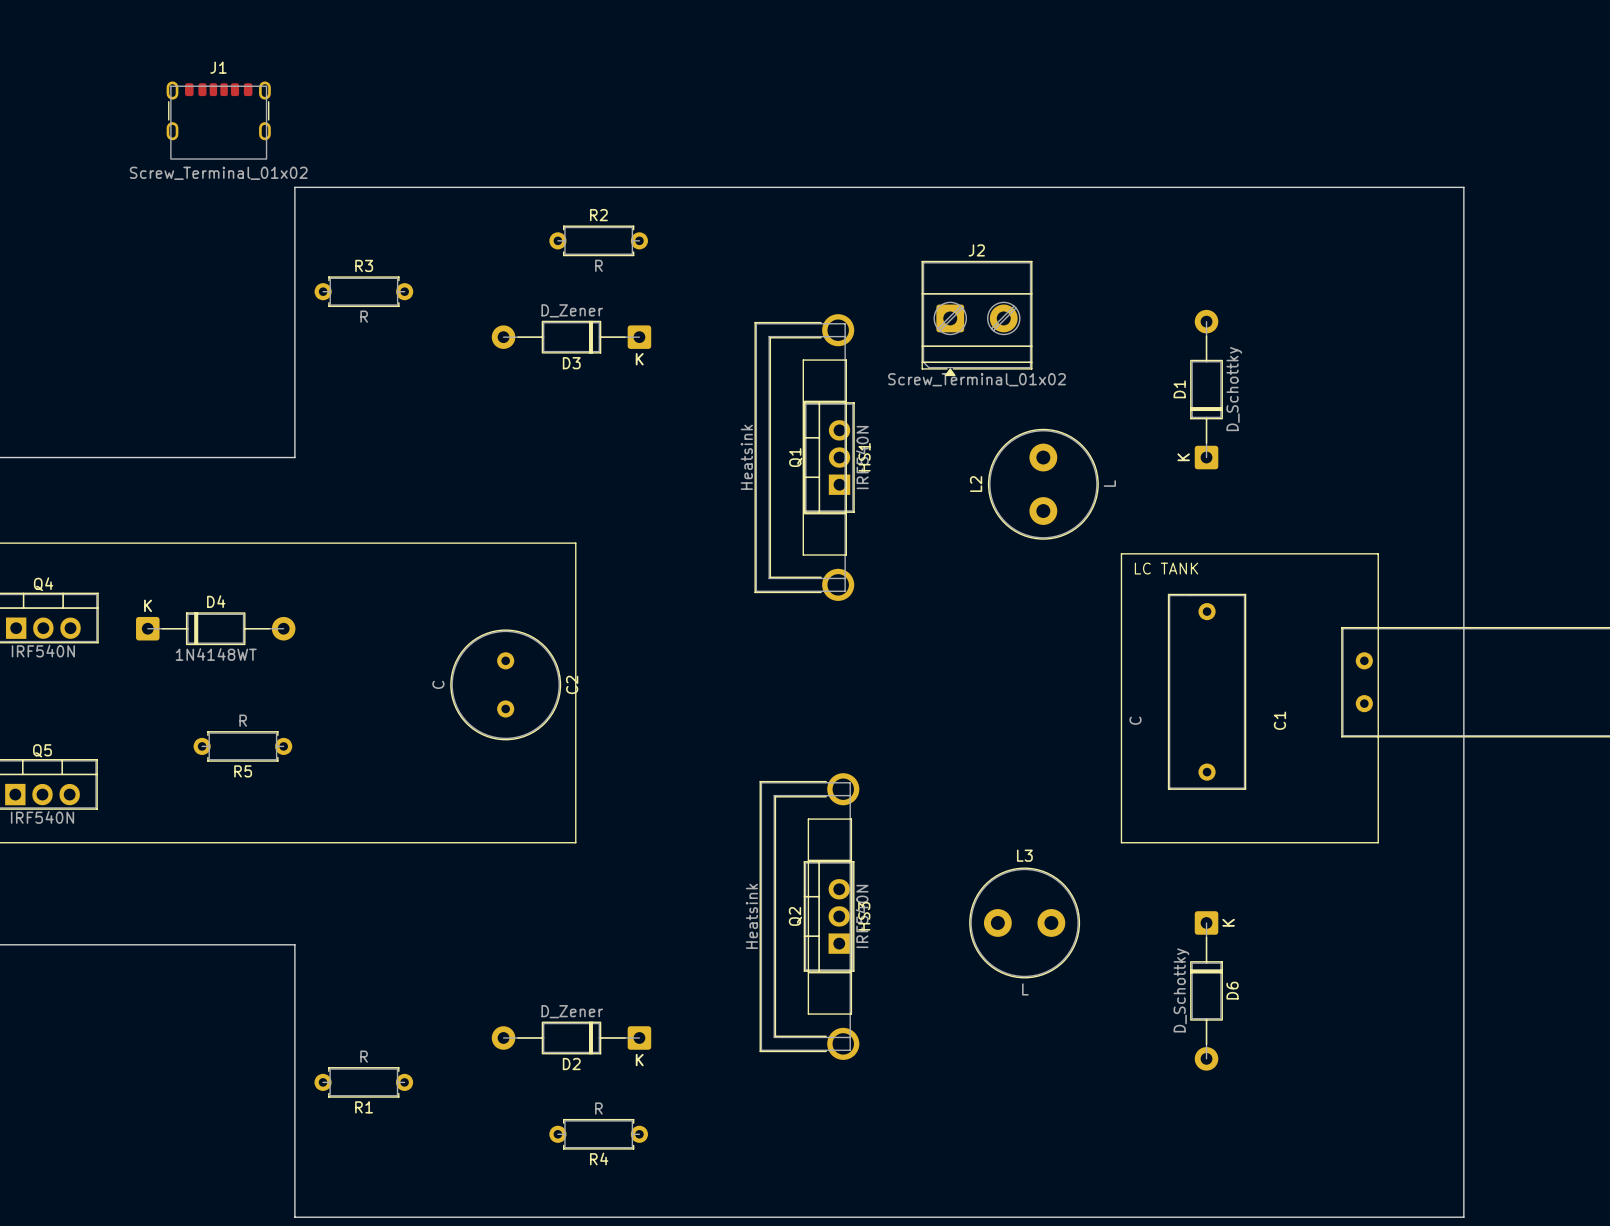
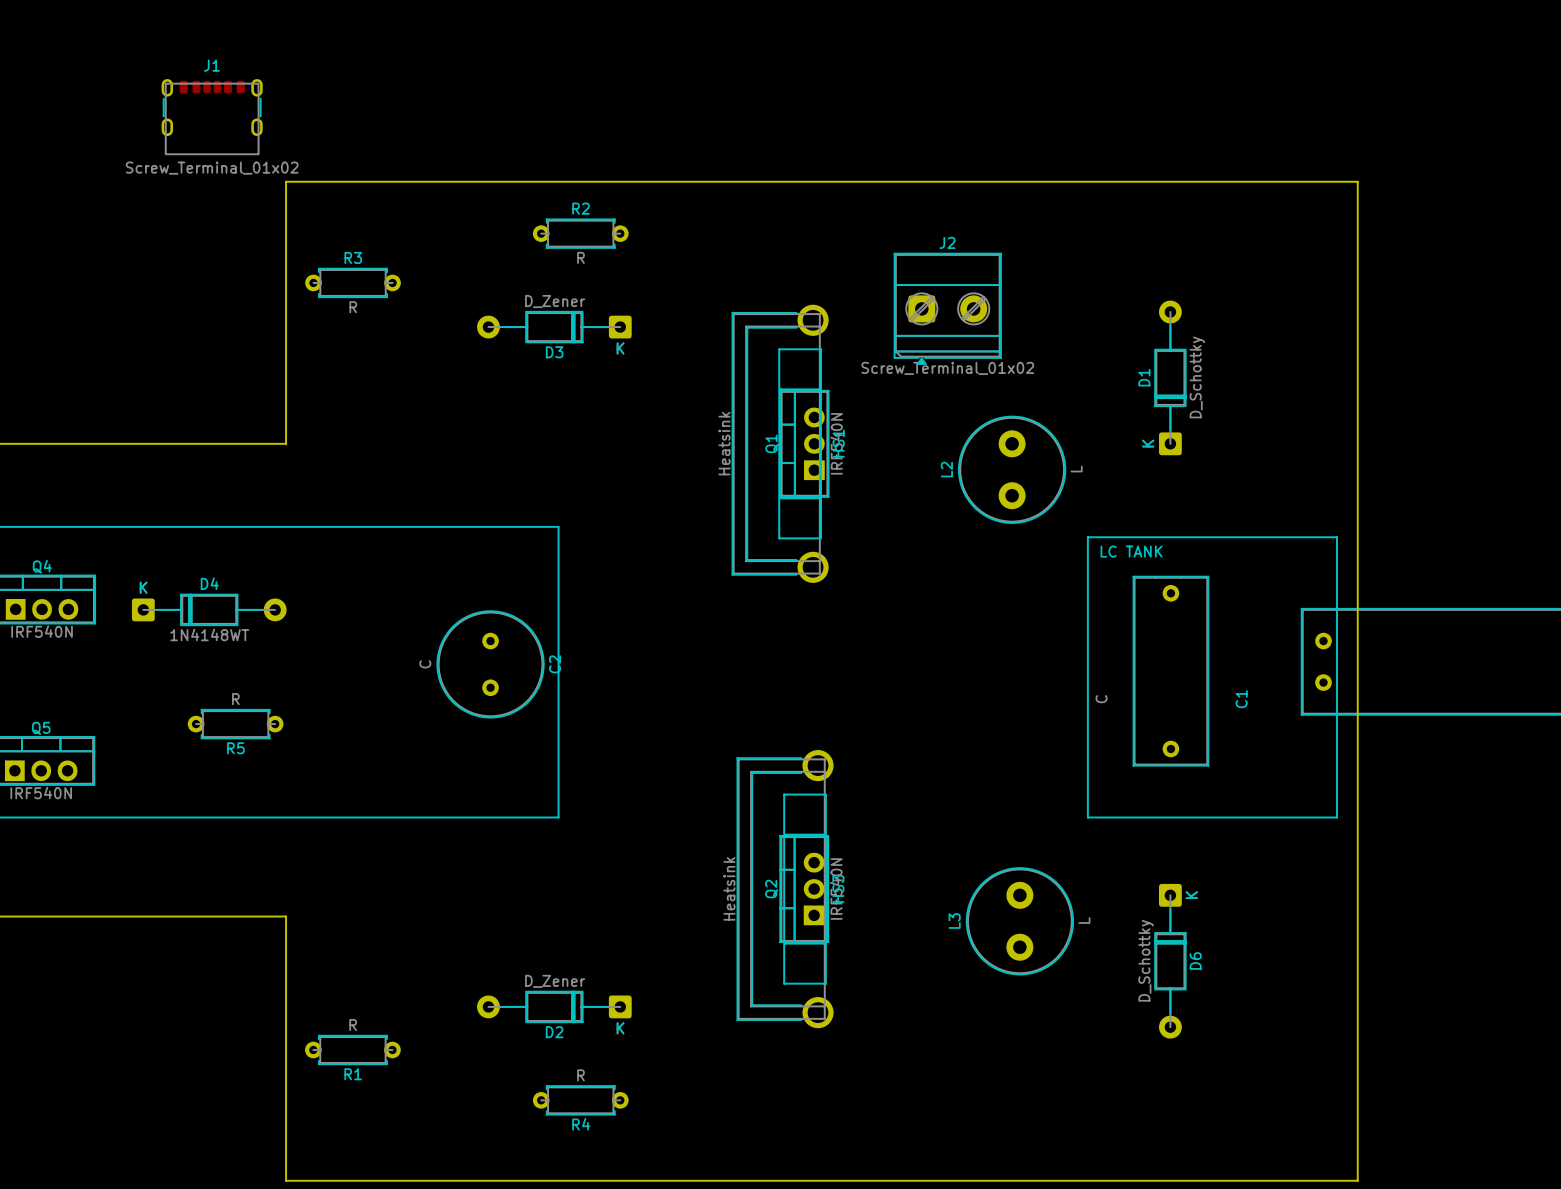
board edge: (1399, 187) (1463, 187) (1463, 1217) (1399, 1217) -> (1357, 181) (1357, 1180)
L3 name position: L3 (1024, 855) -> L3 (954, 921)
L3 rotation: 0° (1024, 922) -> 90° clockwise (1019, 921)
L3 value position: L (1025, 989) -> L (1084, 920)

